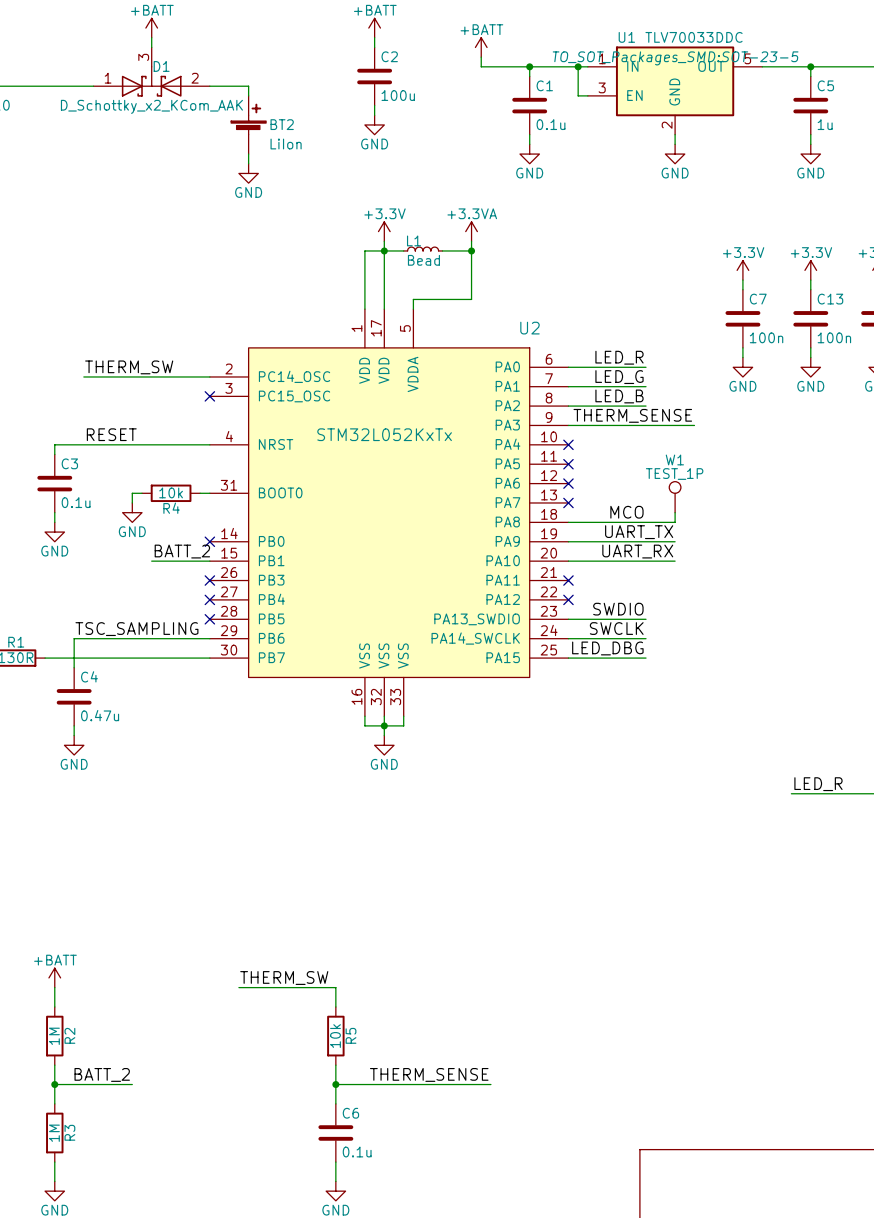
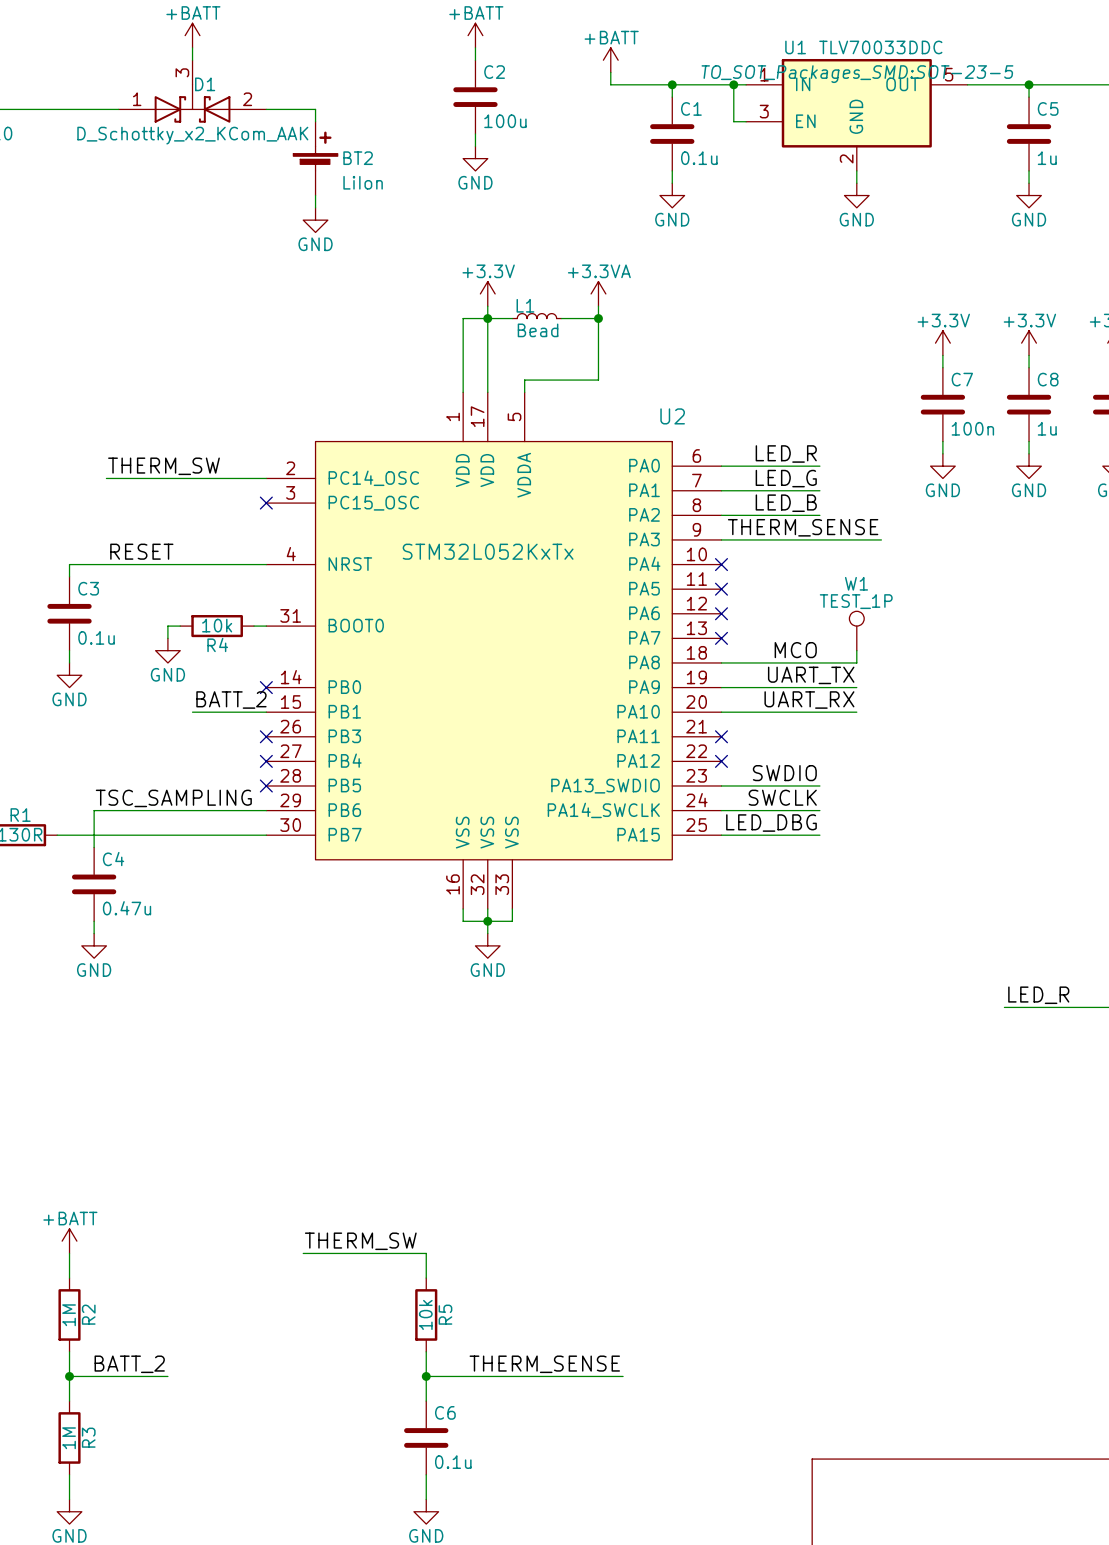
C13 name: C13 (830, 299) -> C8 (1048, 379)
C13 value: 100n (834, 337) -> 1u (1047, 428)

